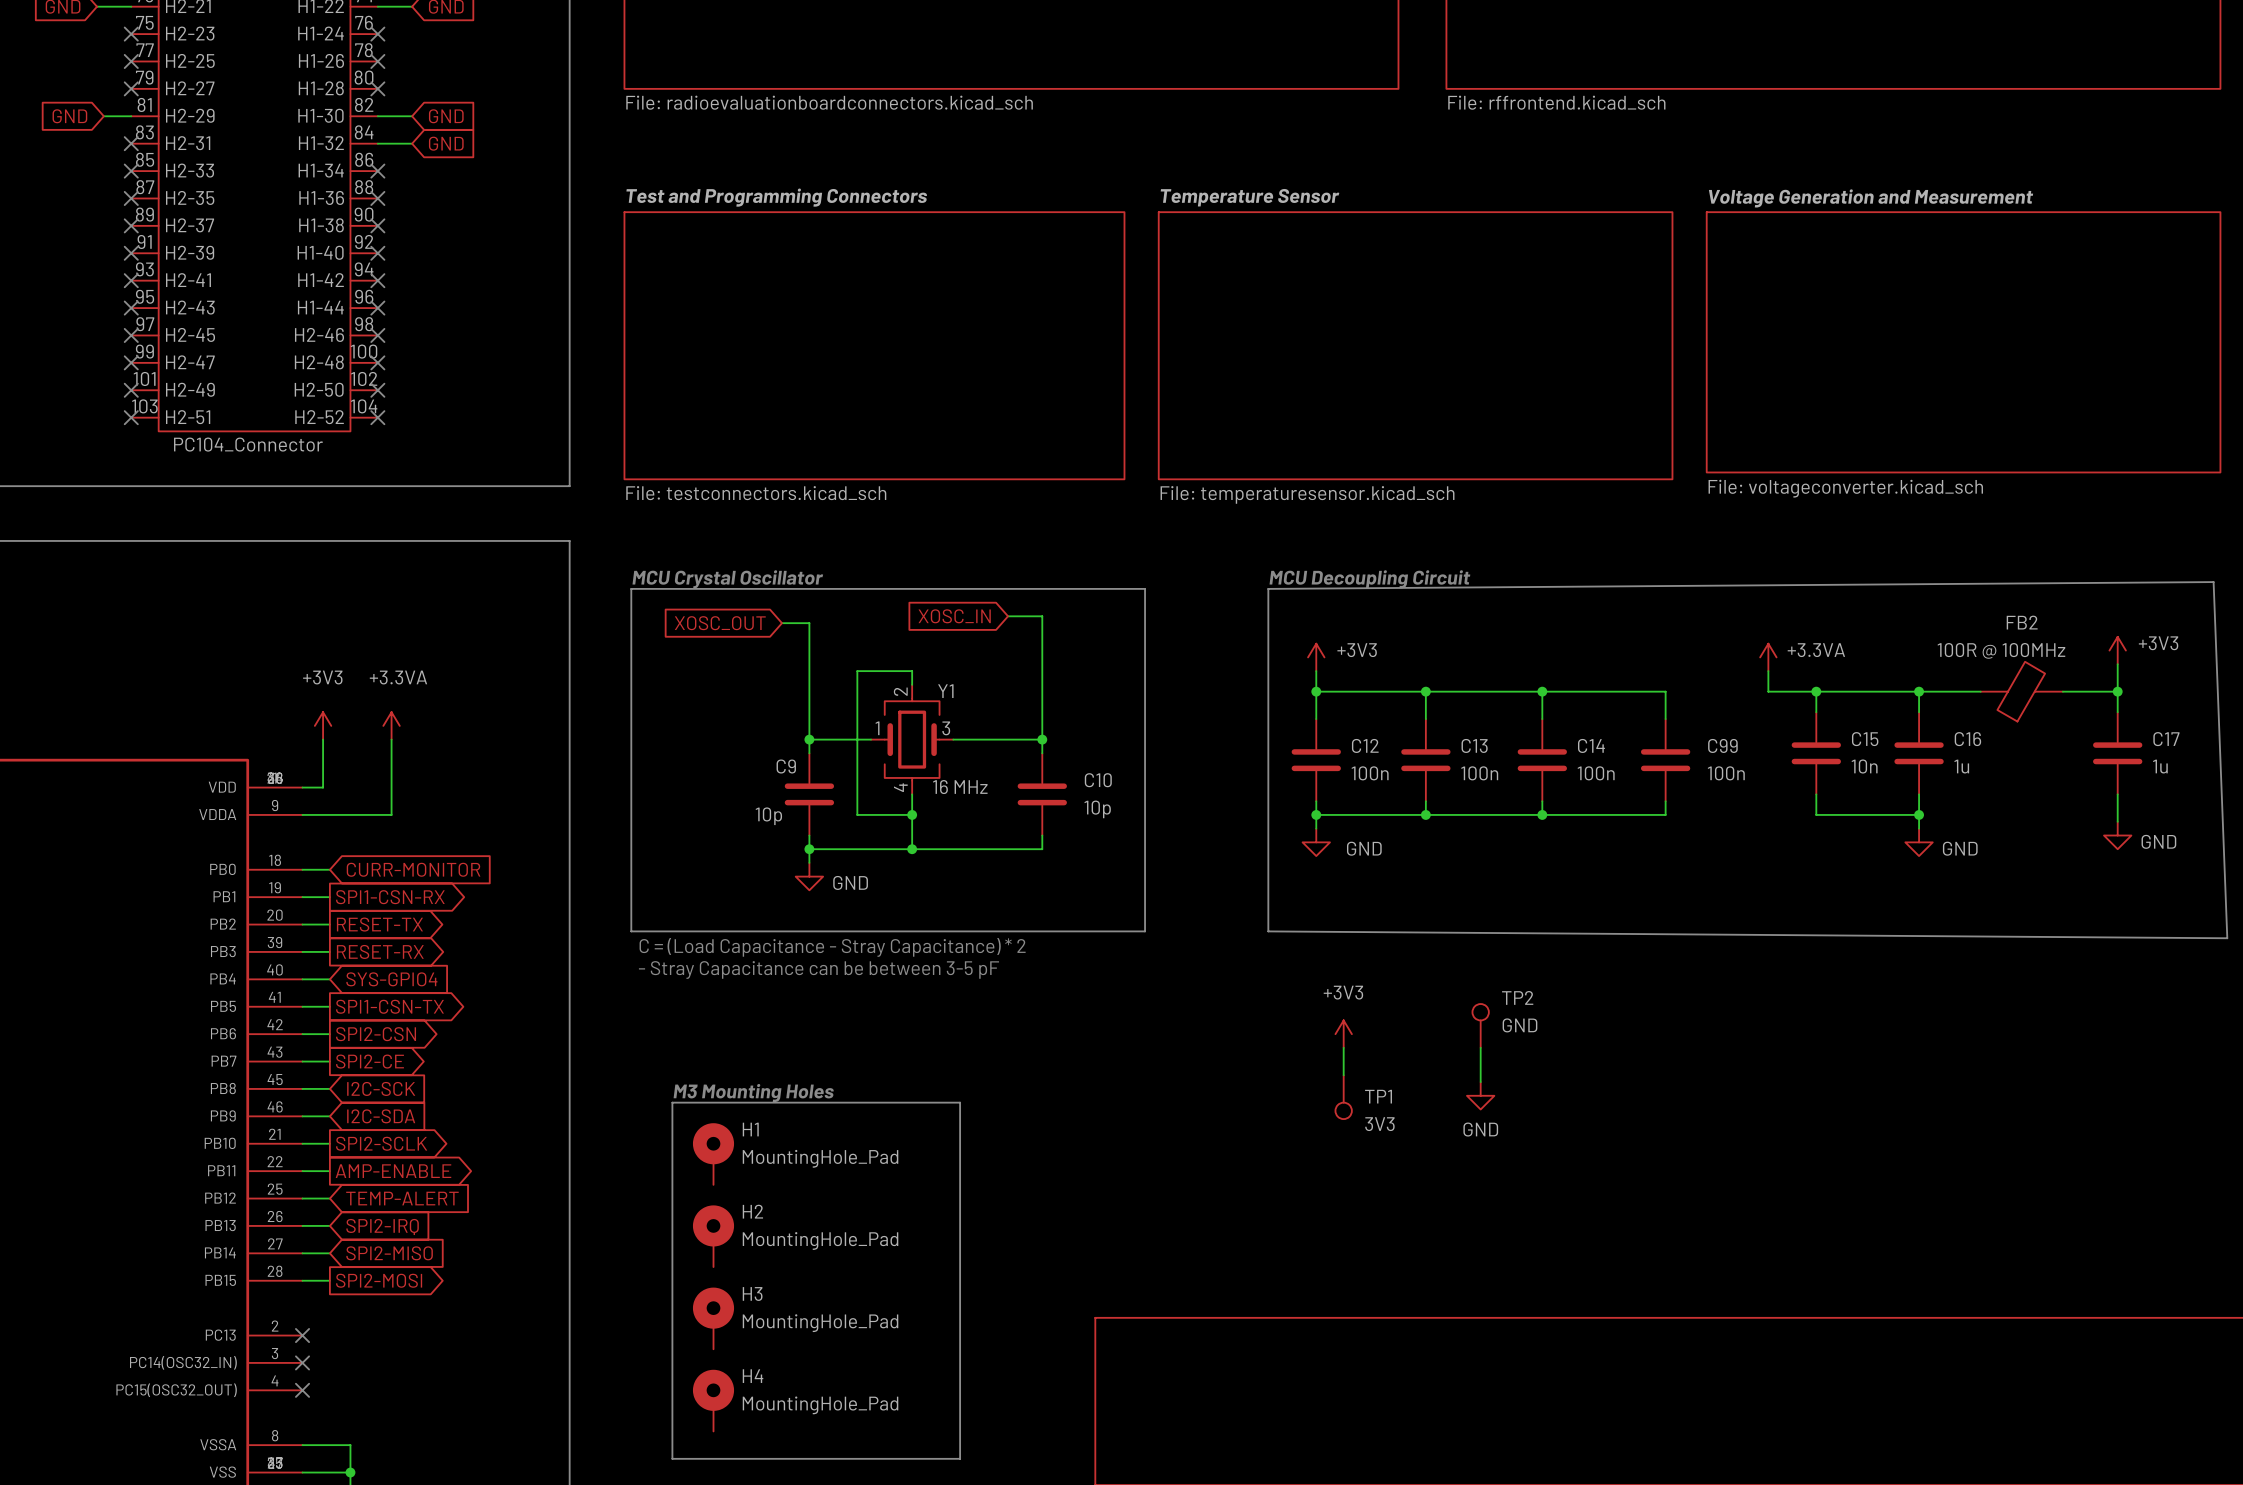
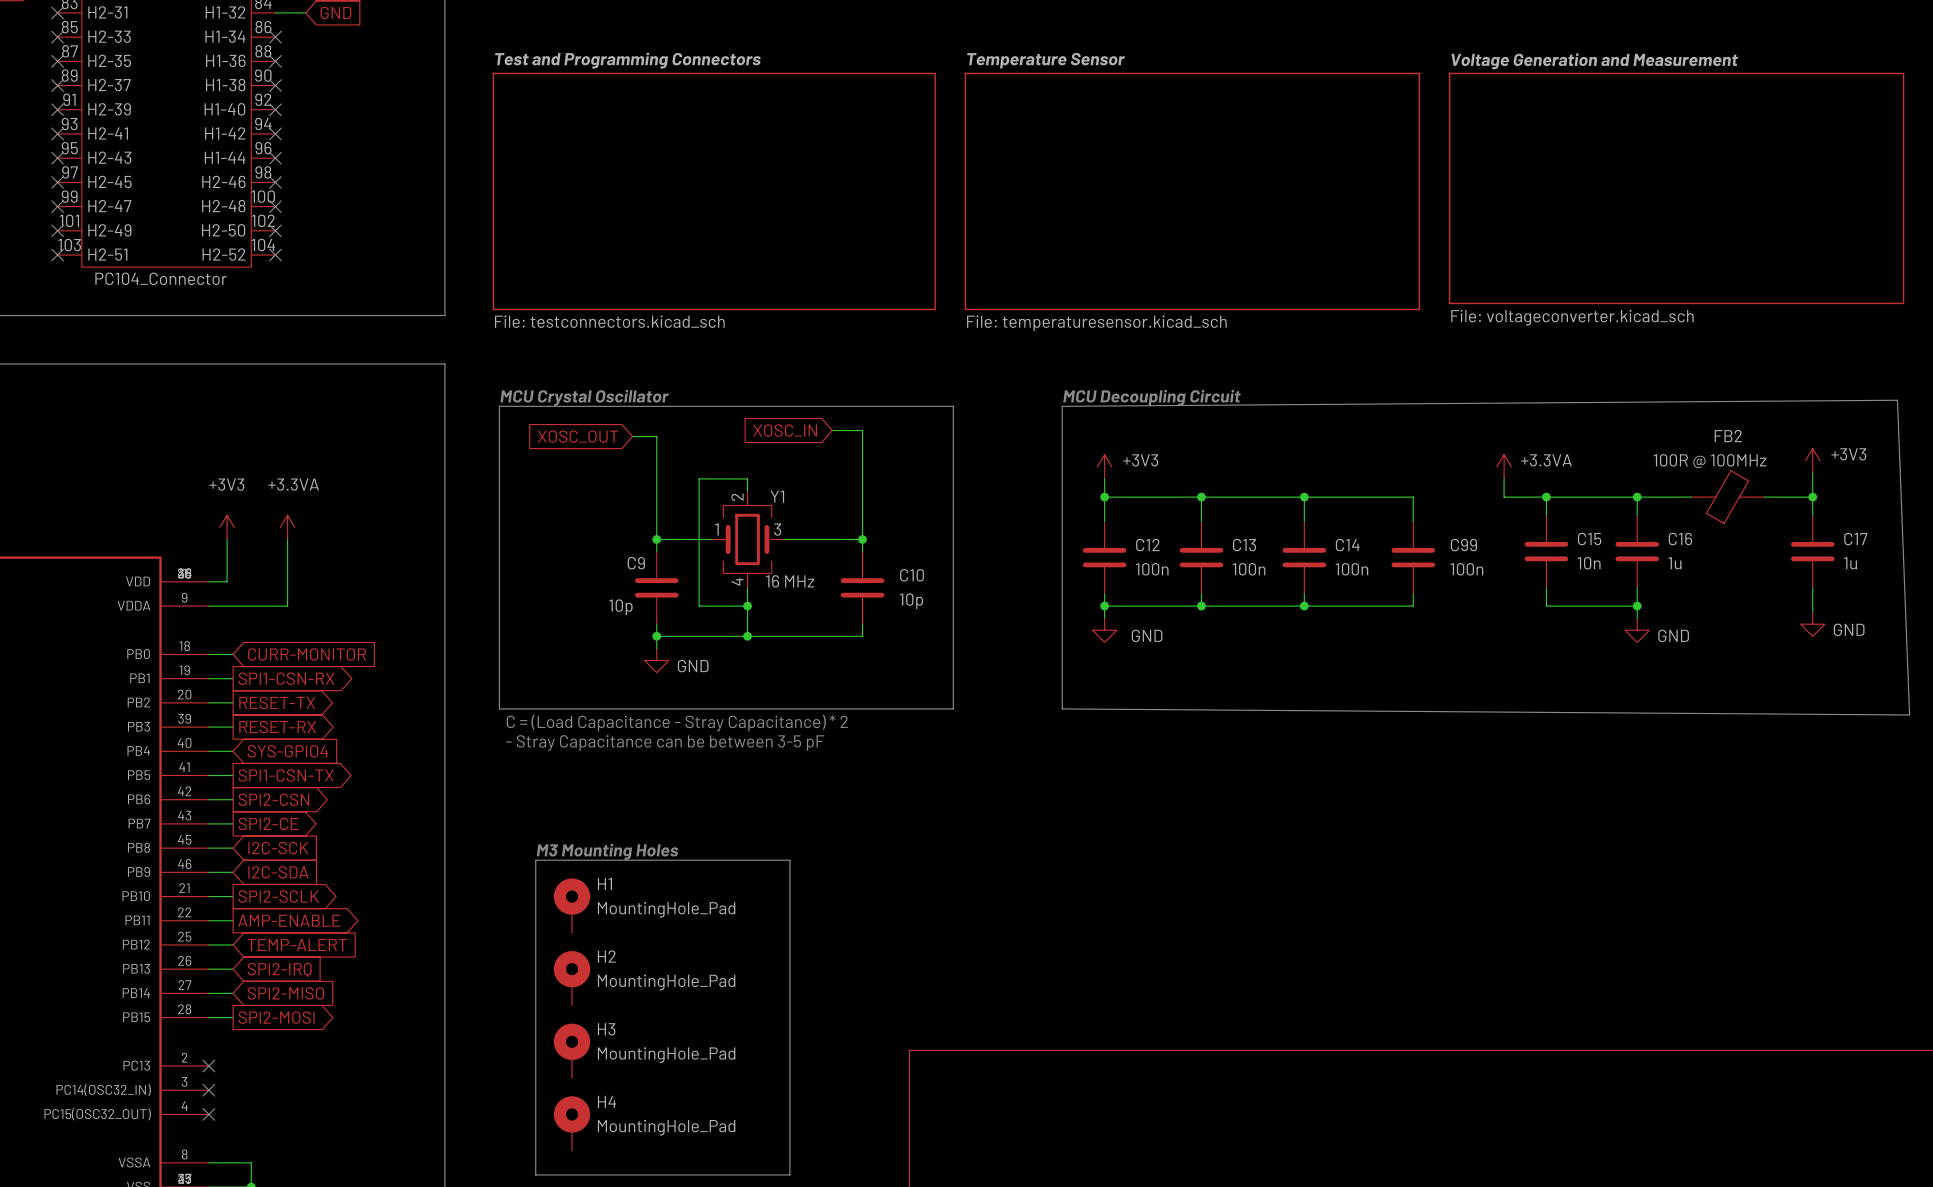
TP2: GND (1480, 1025) -> none
power symbol: +3V3 (1343, 1034) -> none
wire: (1343, 1047) (1343, 1075) -> none
wire: (1480, 1047) (1480, 1082) -> none
power symbol: GND (1480, 1095) -> none
TP1: 3V3 (1343, 1097) -> none

